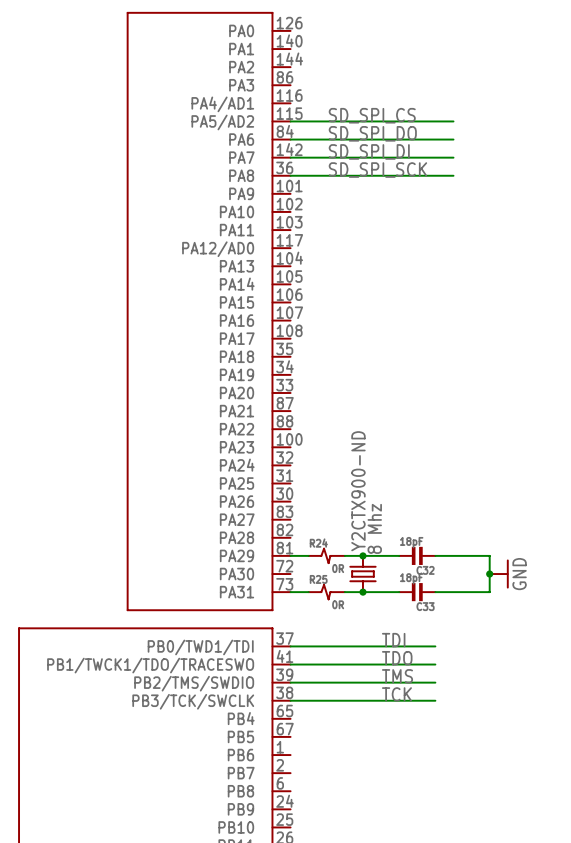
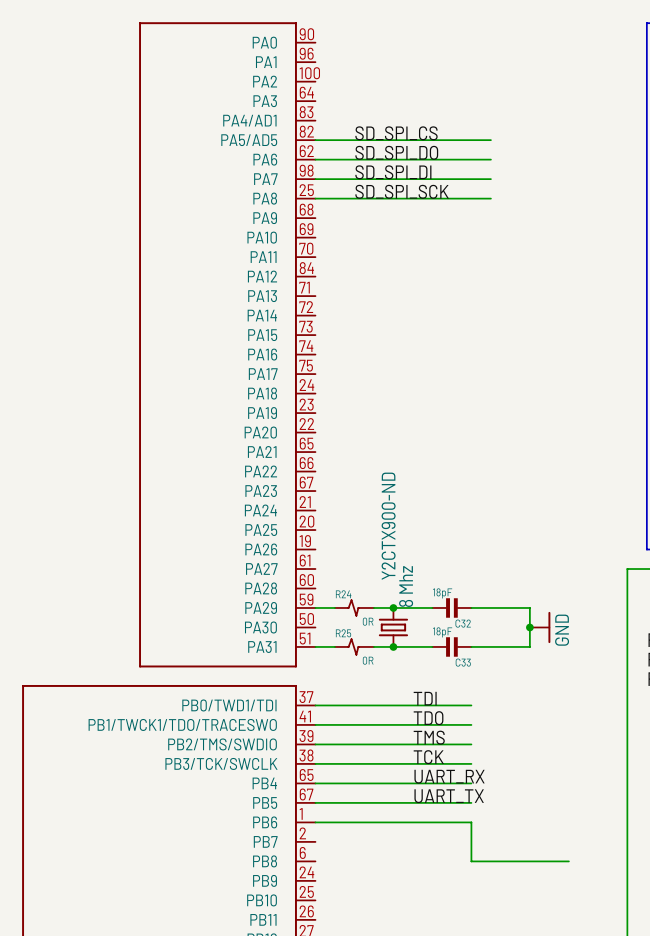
part symbol: [126, 11, 291, 612] -> [139, 22, 316, 668]
label: none -> UART_RX (449, 776)
wire: none -> (315, 783) (471, 783)
label: none -> UART_TX (449, 796)
wire: none -> (315, 802) (471, 802)
wire: none -> (315, 822) (471, 822) (471, 861) (568, 861)

